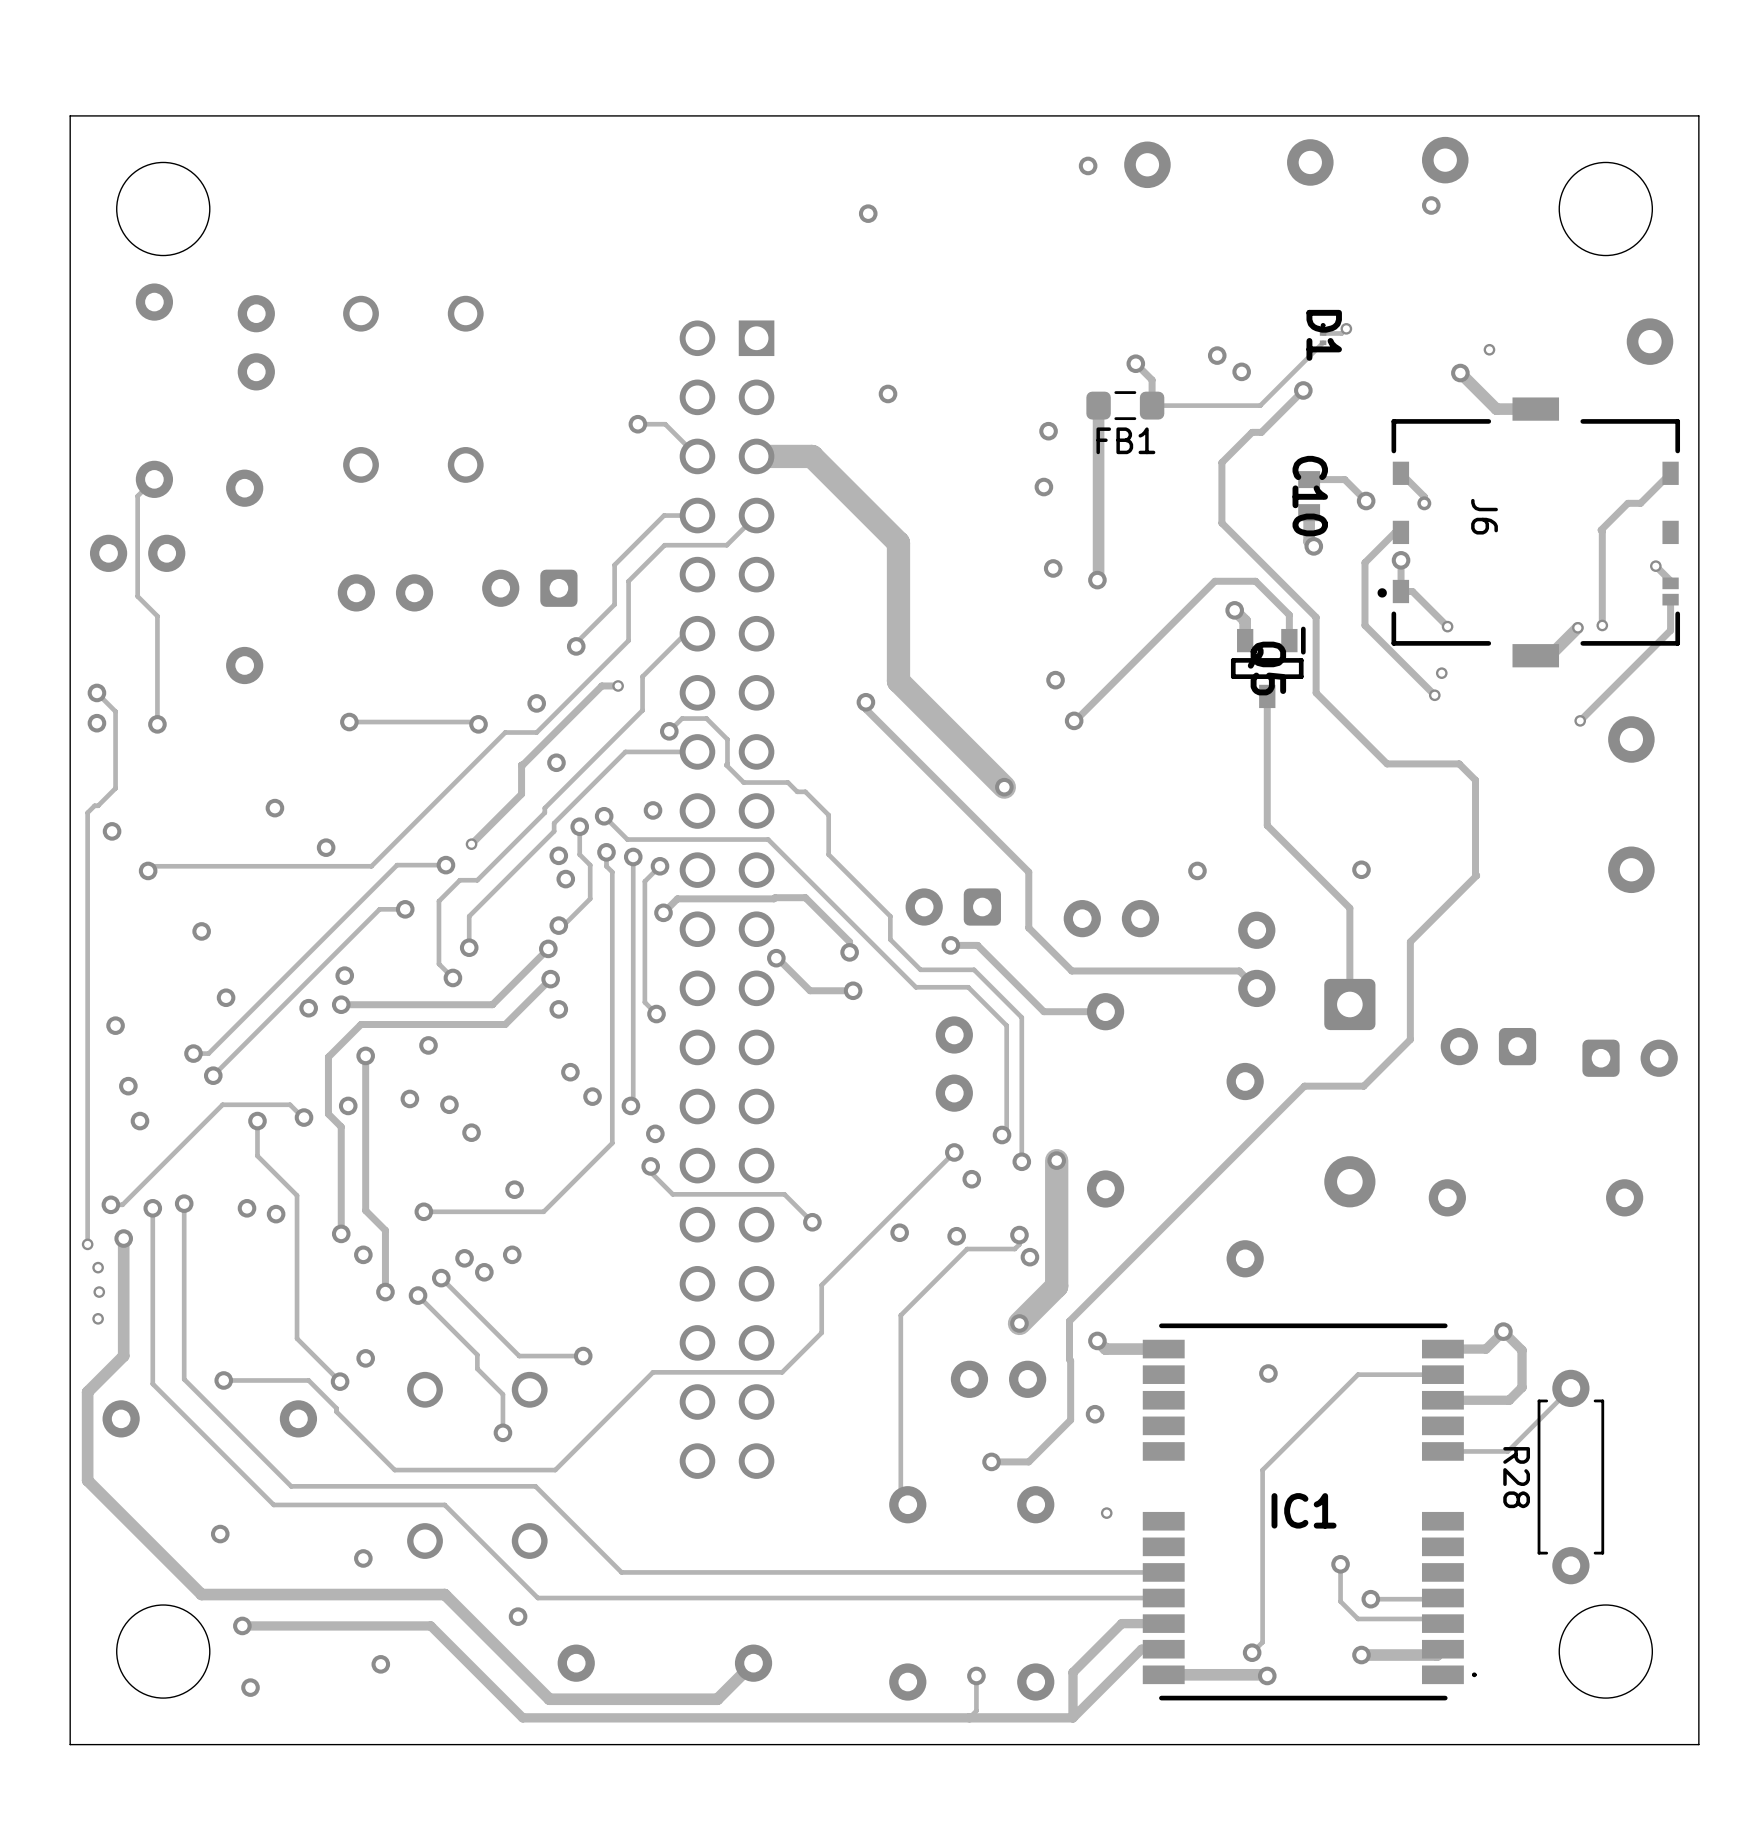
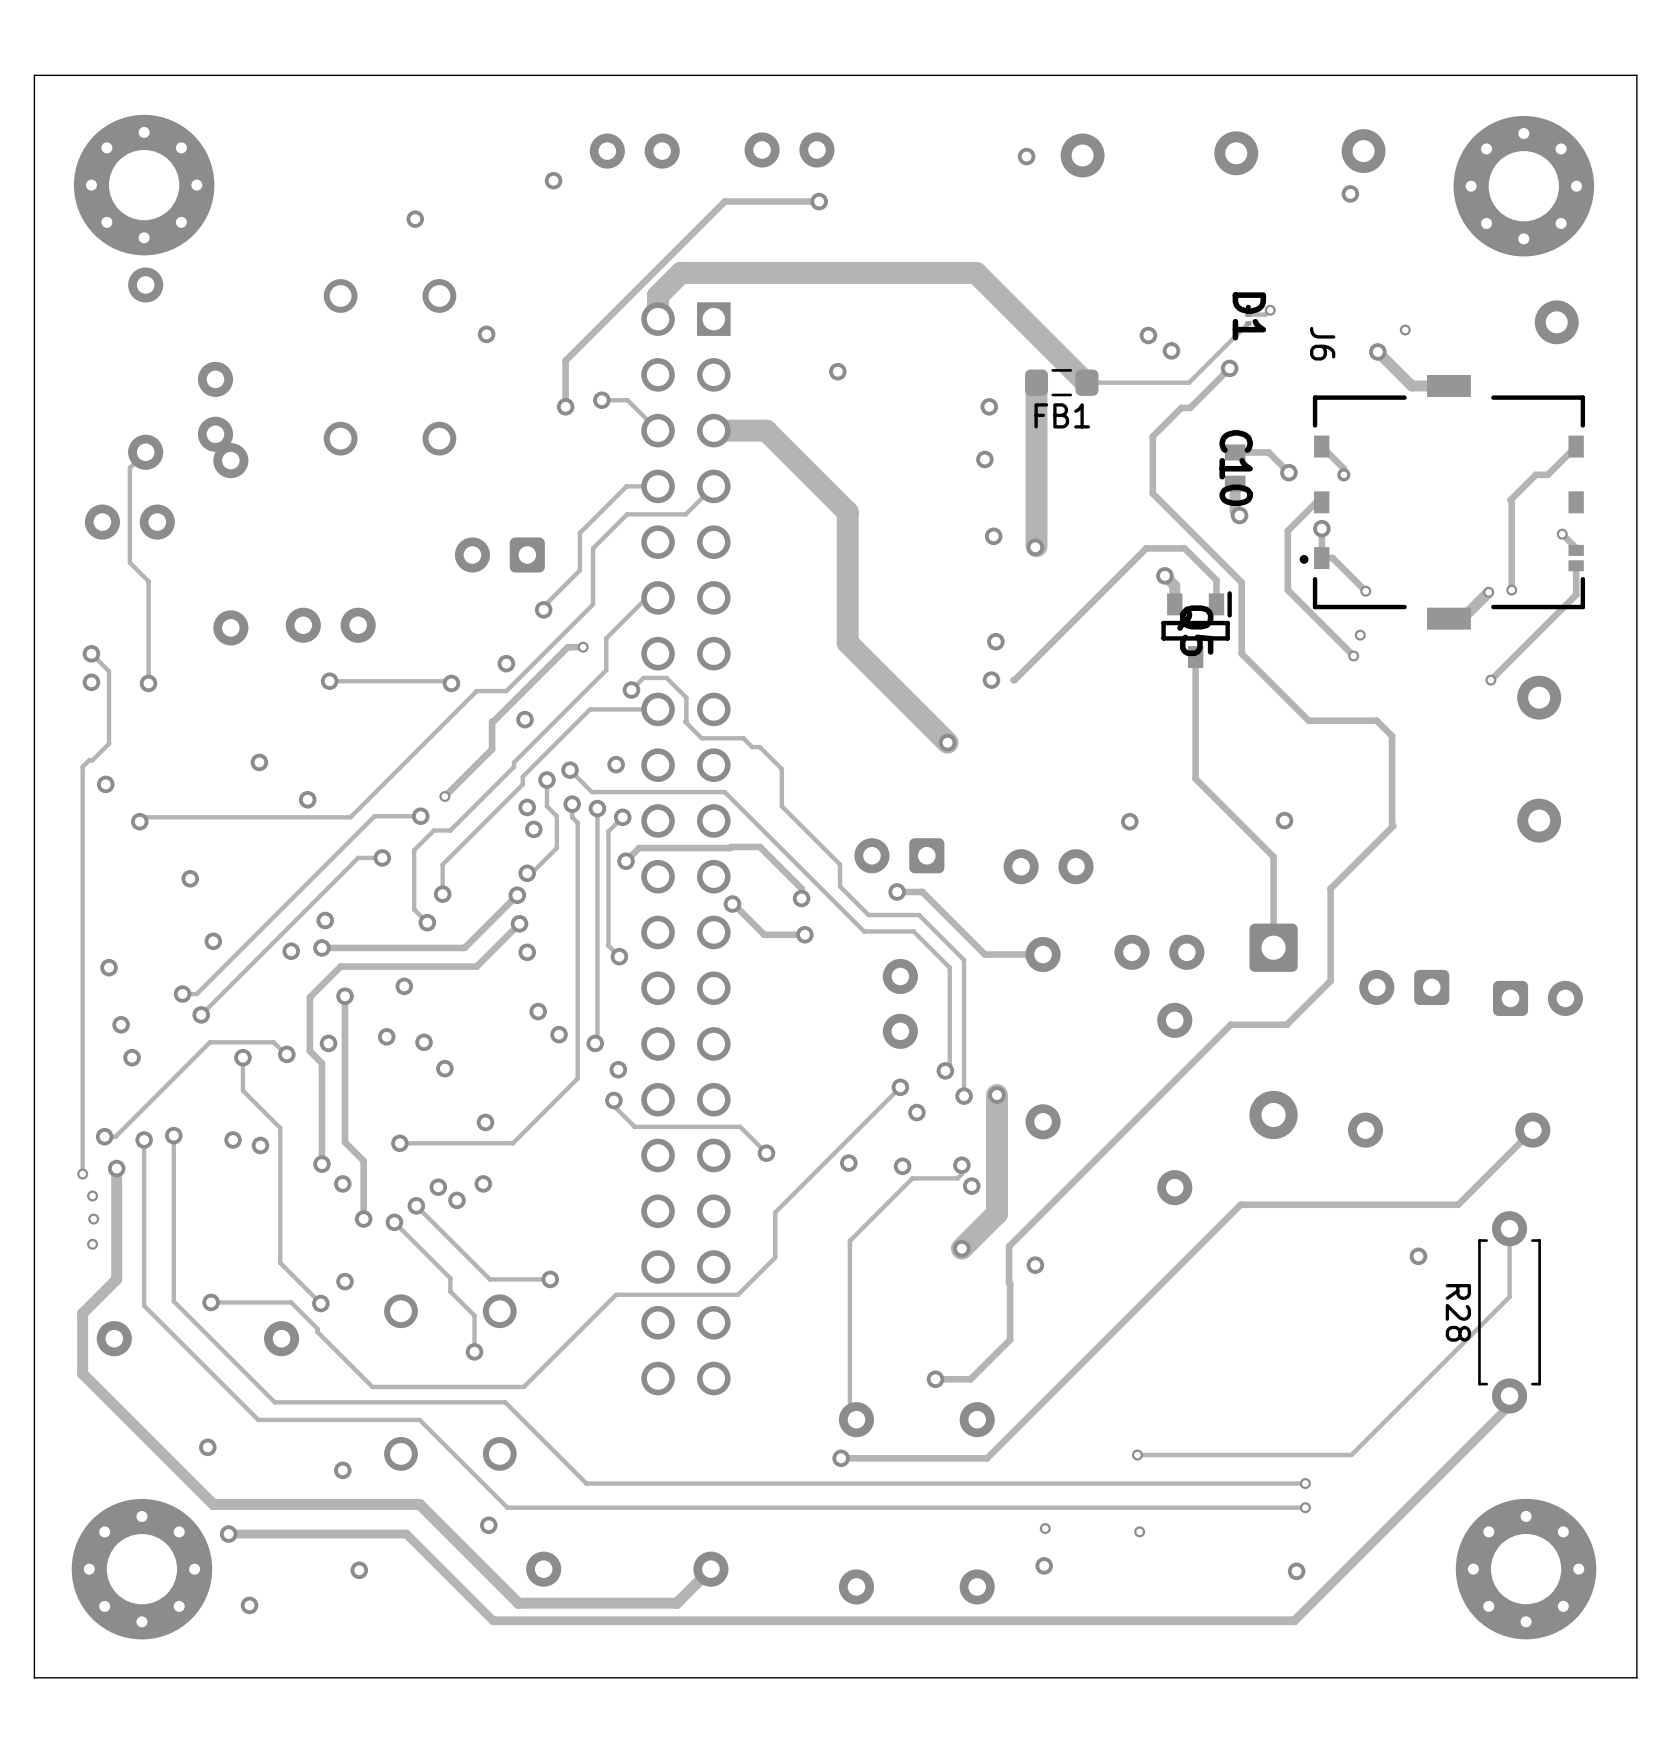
board edge: (1698, 115) (70, 115) (70, 1744) (1698, 1744) (1698, 115) -> (1636, 75) (1636, 1677) (34, 1677) (34, 75) (1636, 75)
part: none -> (789, 149)
part: none -> (634, 151)
round board edge: [116, 161, 211, 257] -> none
round board edge: [1558, 161, 1653, 257] -> none
via: none -> (553, 180)
part: none -> (144, 185)
part: none -> (1523, 186)
track: none -> (819, 201) (724, 201) (565, 360) (565, 406)
via: none -> (415, 219)
part position: (256, 342) -> (215, 406)
via: none -> (486, 334)
track: (1135, 363) (1152, 380) (1152, 405) -> (658, 319) (658, 295) (680, 272) (976, 272) (1086, 382)
via: (1135, 363) -> none
track width: thin (1098, 405) (1098, 578) -> thick (1036, 382) (1036, 546)
via: none -> (565, 406)
J6 name position: J6 (1484, 516) -> J6 (1322, 343)
part position: (385, 592) -> (330, 625)
track: (865, 702) (865, 709) (1028, 872) (1028, 927) (1071, 970) (1239, 970) (1256, 988) -> none
via: (865, 702) -> none
via position: (1074, 720) -> (991, 680)
part rotation: 0° (1256, 959) -> 90° clockwise (1159, 952)
part position: (1256, 959) -> (1159, 952)
track: none -> (1532, 1130) (1458, 1204) (1240, 1204) (987, 1458) (841, 1458)
track: none -> (1509, 1228) (1509, 1296) (1351, 1455) (1137, 1455)
track: (1097, 1340) (1105, 1349) (1163, 1349) -> none
track: (1442, 1349) (1485, 1349) (1503, 1331) (1522, 1350) (1522, 1387) (1509, 1400) (1442, 1400) -> none
via: (1268, 1373) -> none
track: (1442, 1374) (1358, 1374) (1262, 1470) (1262, 1642) (1252, 1652) -> none
part: (998, 1379) -> none
track: (1570, 1388) (1507, 1451) (1442, 1451) -> none
via: (1095, 1414) -> none
track: (87, 1456) (87, 1480) (201, 1594) (226, 1594) -> (82, 1373) (213, 1504)
R28 position: (1570, 1477) -> (1509, 1312)
track: none -> (1509, 1395) (1509, 1405) (1294, 1620) (1012, 1620)
IC1: (1309, 1511) -> none
via: (1106, 1513) -> none
via: none -> (1137, 1455)
via: none -> (841, 1458)
track: (1340, 1564) (1340, 1601) (1358, 1618) (1438, 1618) (1442, 1623) -> none
via: (1340, 1564) -> none
track: none -> (1305, 1483) (1097, 1483)
via: none -> (1305, 1483)
via size: [1361, 1589, 1381, 1609] -> [1299, 1502, 1311, 1514]
track: none -> (1305, 1507) (1097, 1507)
track: (1442, 1598) (1370, 1599) -> none
round board edge: [116, 1604, 211, 1699] -> none
round board edge: [1558, 1604, 1653, 1699] -> none
via: none -> (1045, 1528)
track: (1163, 1623) (1121, 1623) (1072, 1672) (1072, 1717) (1141, 1649) (1163, 1649) -> none
via: none -> (1139, 1531)
track: (1442, 1649) (1437, 1655) (1361, 1655) -> none
via: (1252, 1652) -> none
via position: (1361, 1655) -> (1296, 1571)
via: none -> (1044, 1565)
part: none -> (141, 1569)
part: none -> (1526, 1569)
track: (1163, 1674) (1267, 1675) -> none
track: (976, 1675) (976, 1710) (969, 1717) -> none
via: (976, 1675) -> none
via: (1267, 1675) -> none
via position: (250, 1687) -> (249, 1605)

